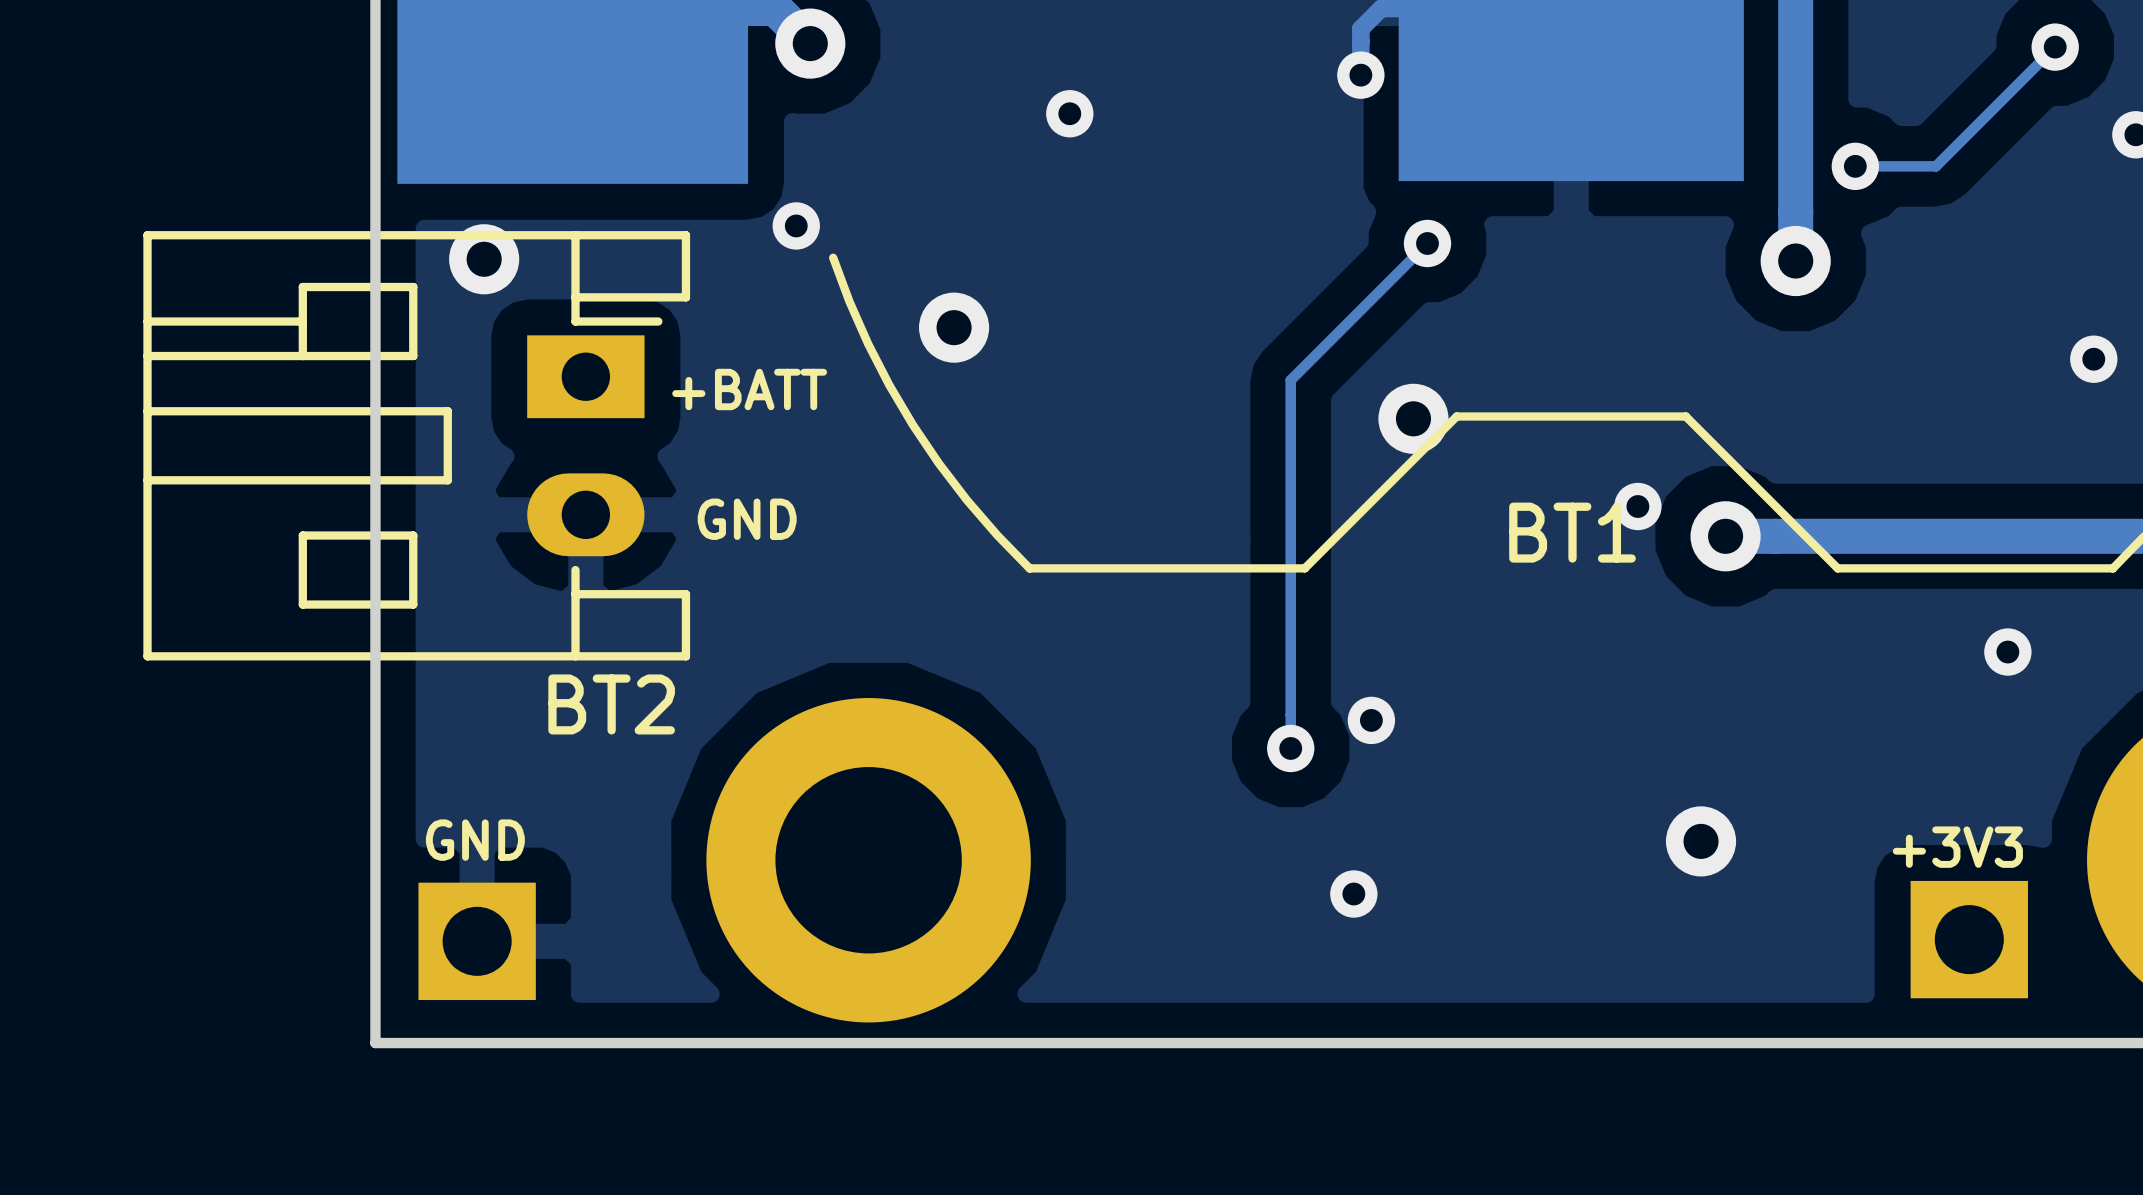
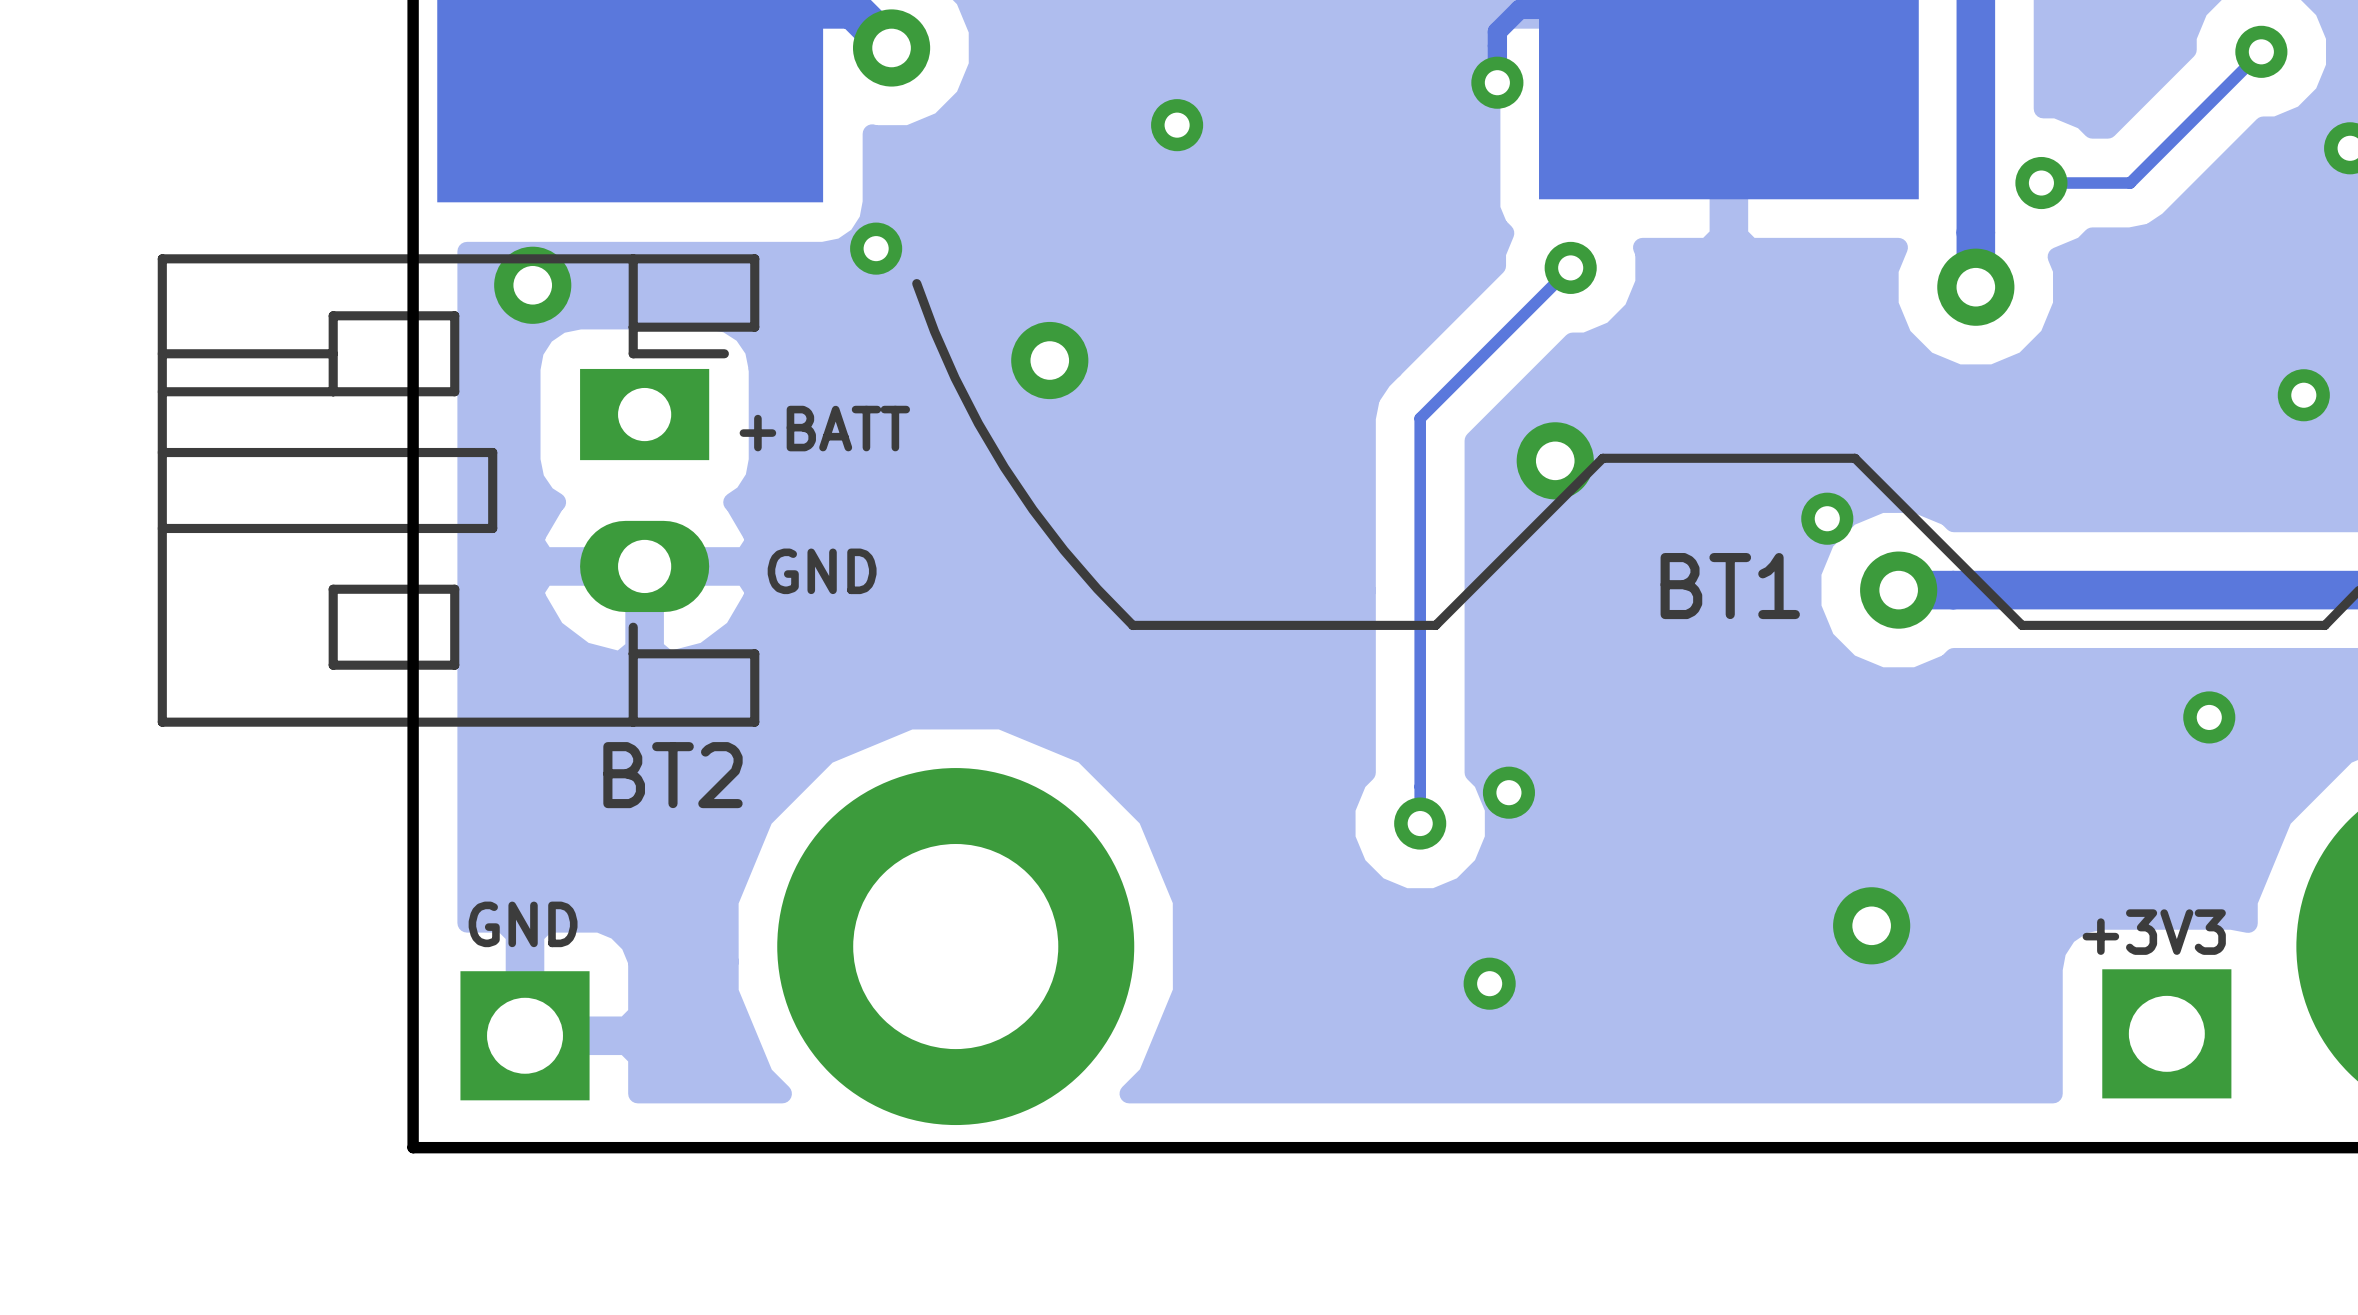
via position: (1637, 506) -> (1827, 518)

